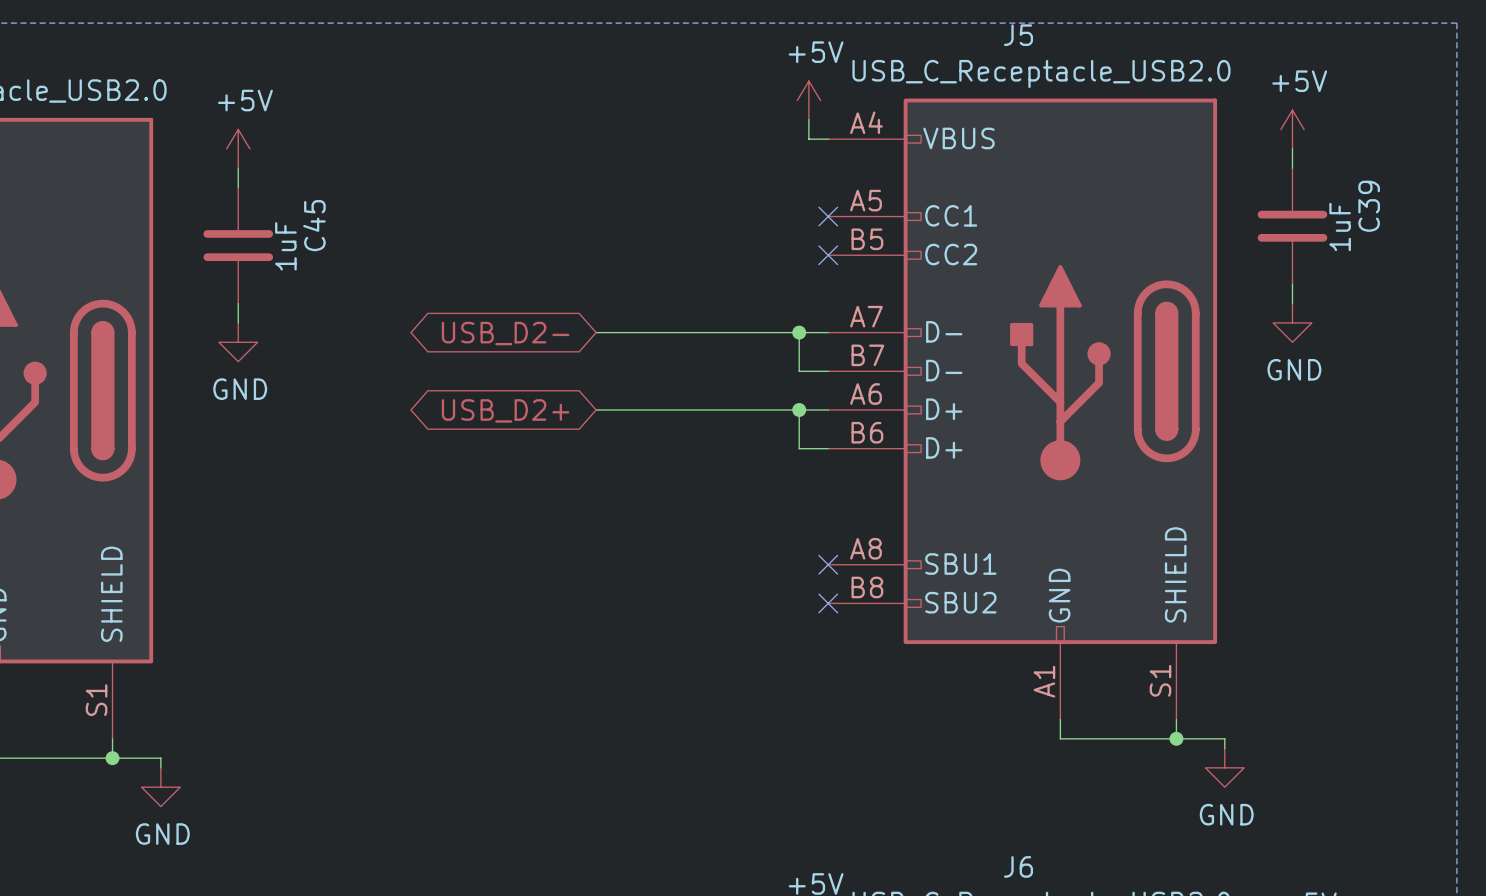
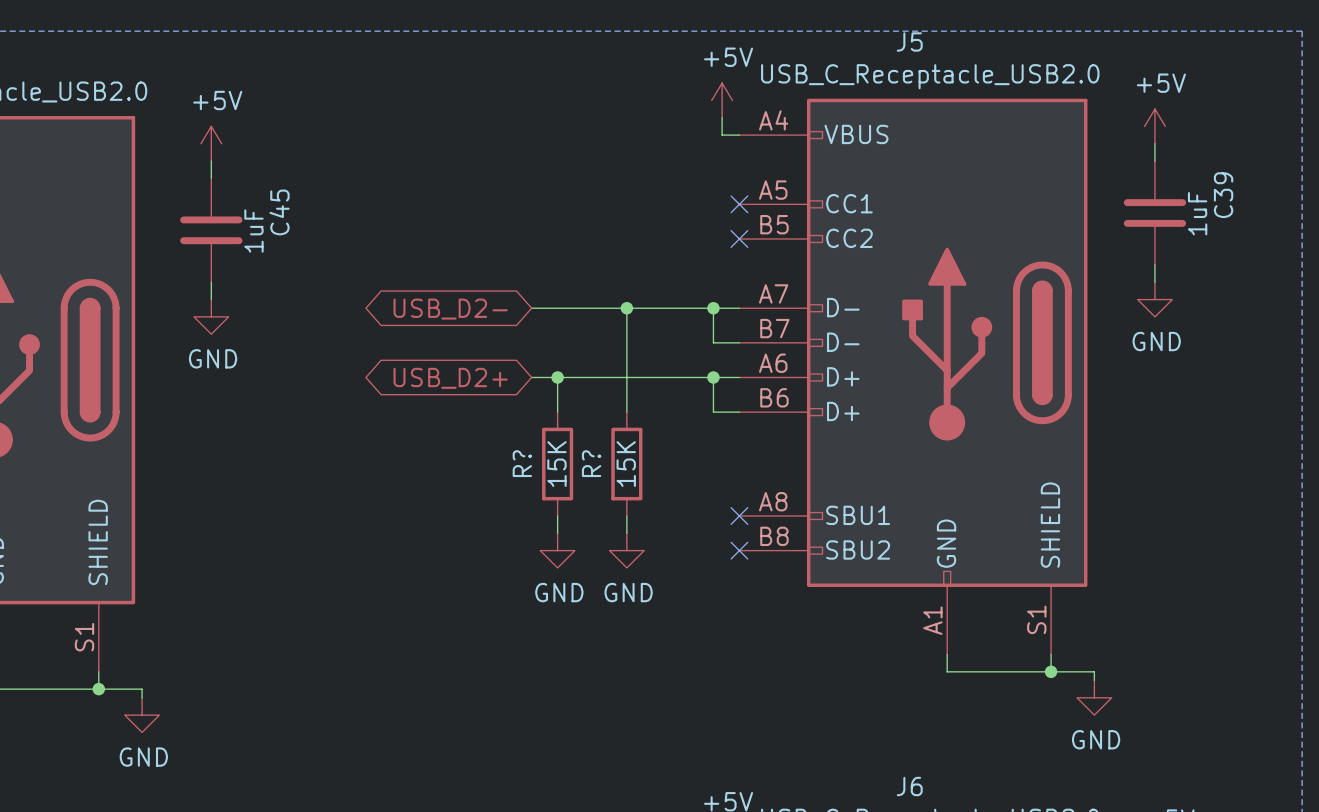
wire: none -> (626, 308) (626, 412)
junction: none -> (626, 308)
wire: none -> (557, 377) (557, 412)
junction: none -> (557, 377)
R?: none -> 15K (557, 464)
R?: none -> 15K (626, 464)
wire: none -> (557, 516) (557, 533)
wire: none -> (626, 516) (626, 533)
power symbol: none -> GND (557, 550)
power symbol: none -> GND (626, 550)

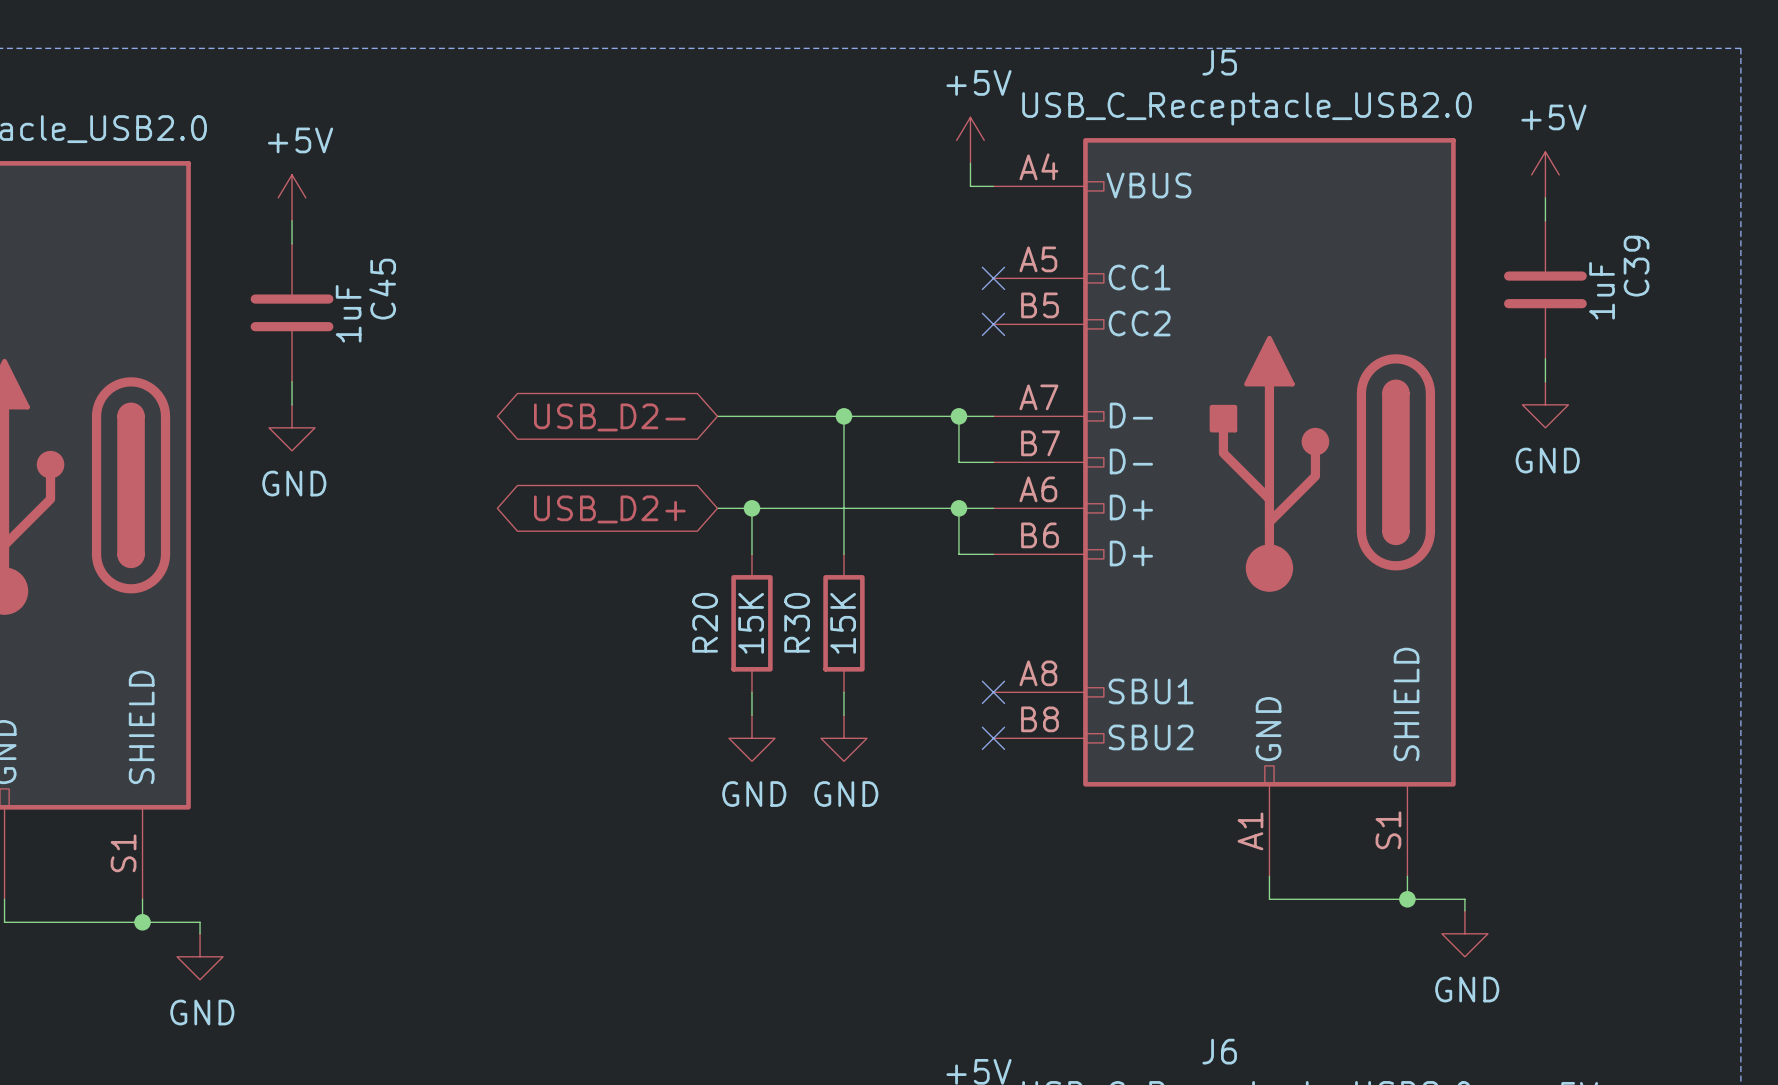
R? name: R? (522, 463) -> R20 (705, 622)
R? name: R? (591, 463) -> R30 (797, 622)

